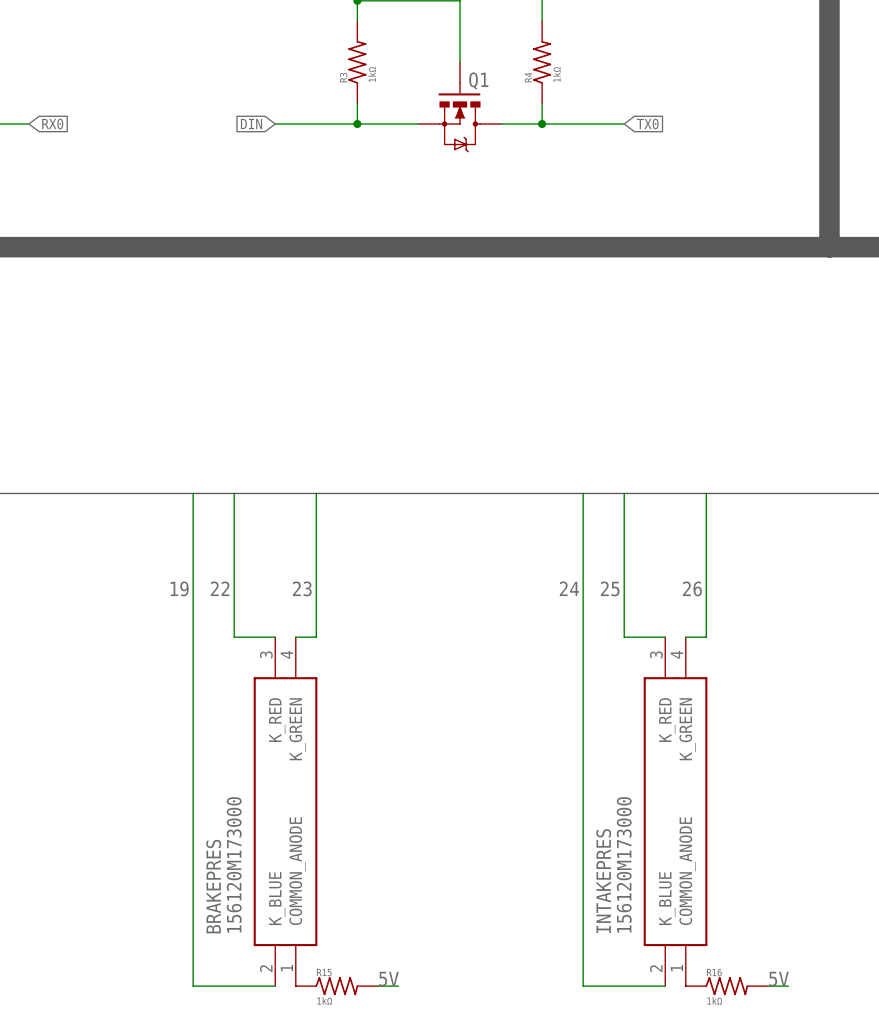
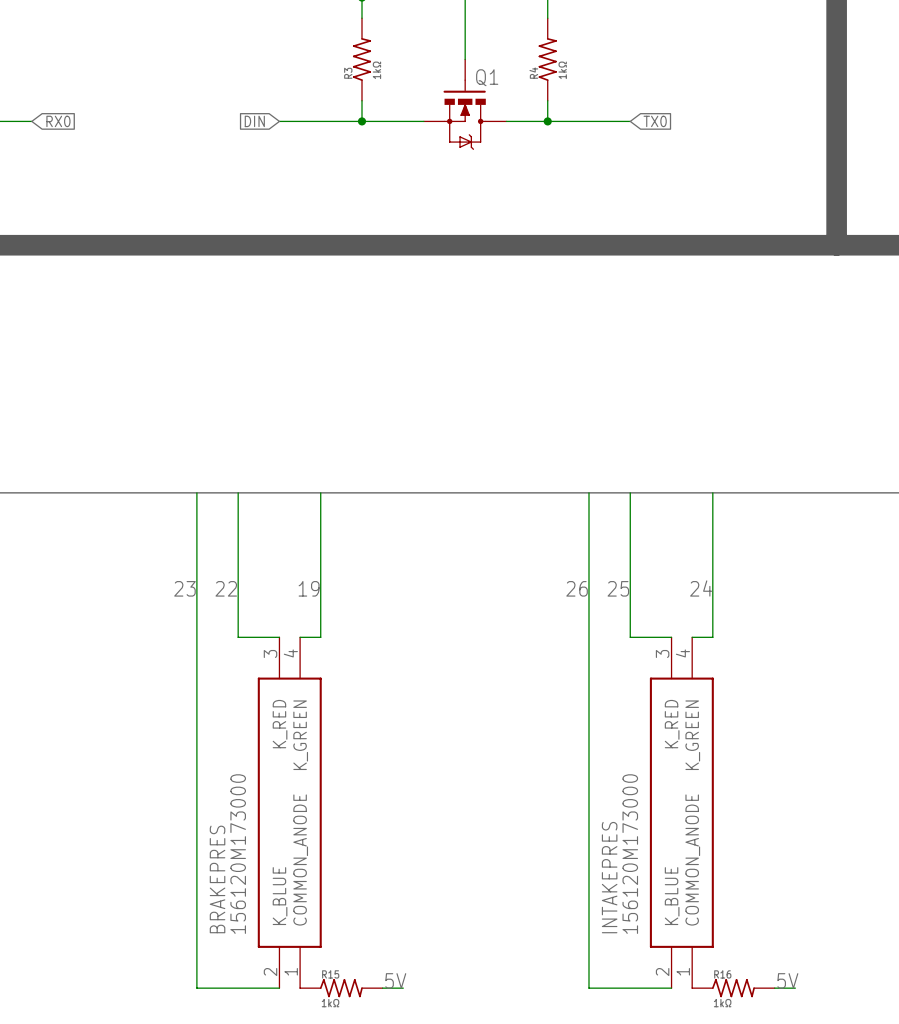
label: 19 (179, 588) -> 23 (184, 588)
label: 23 (302, 588) -> 19 (309, 588)
label: 24 (569, 588) -> 26 (577, 588)
label: 26 (692, 588) -> 24 (701, 588)

